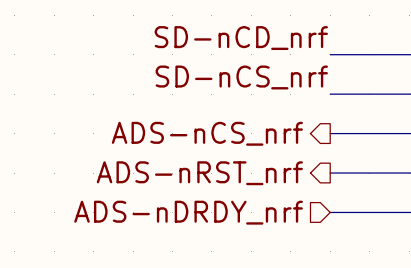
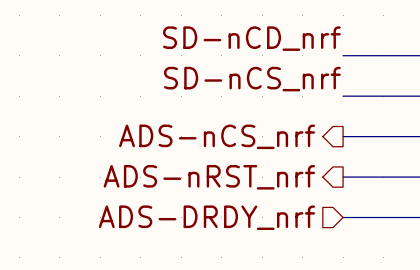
hierarchical label: ADS-nDRDY_nrf (188, 212) -> ADS-DRDY_nrf (206, 217)

